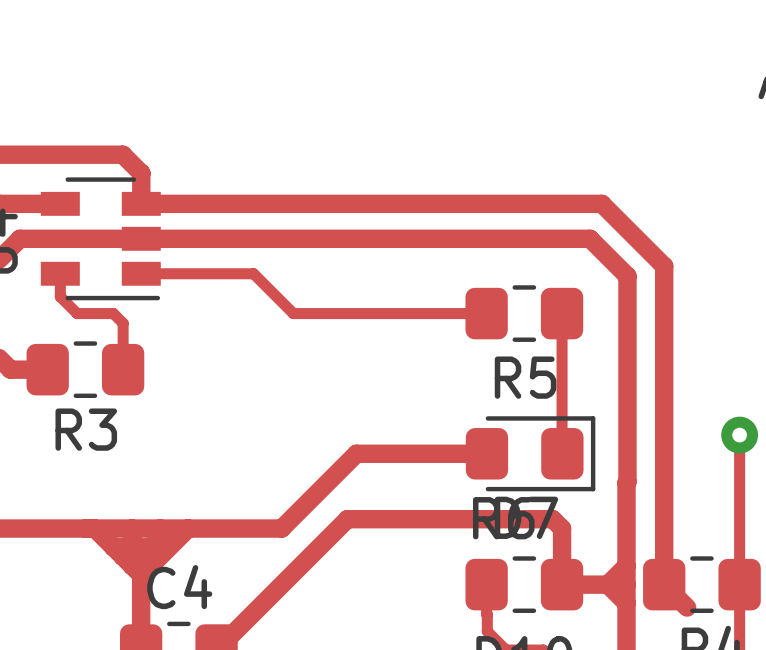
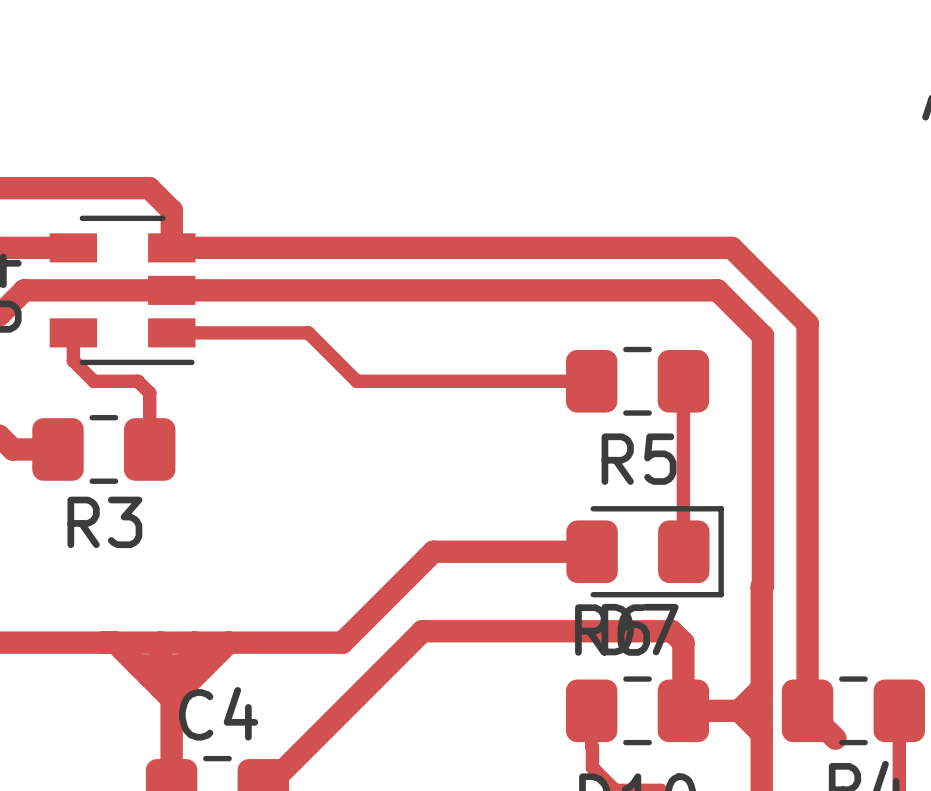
track: (739, 435) (739, 584) -> none
via: (739, 435) -> none

